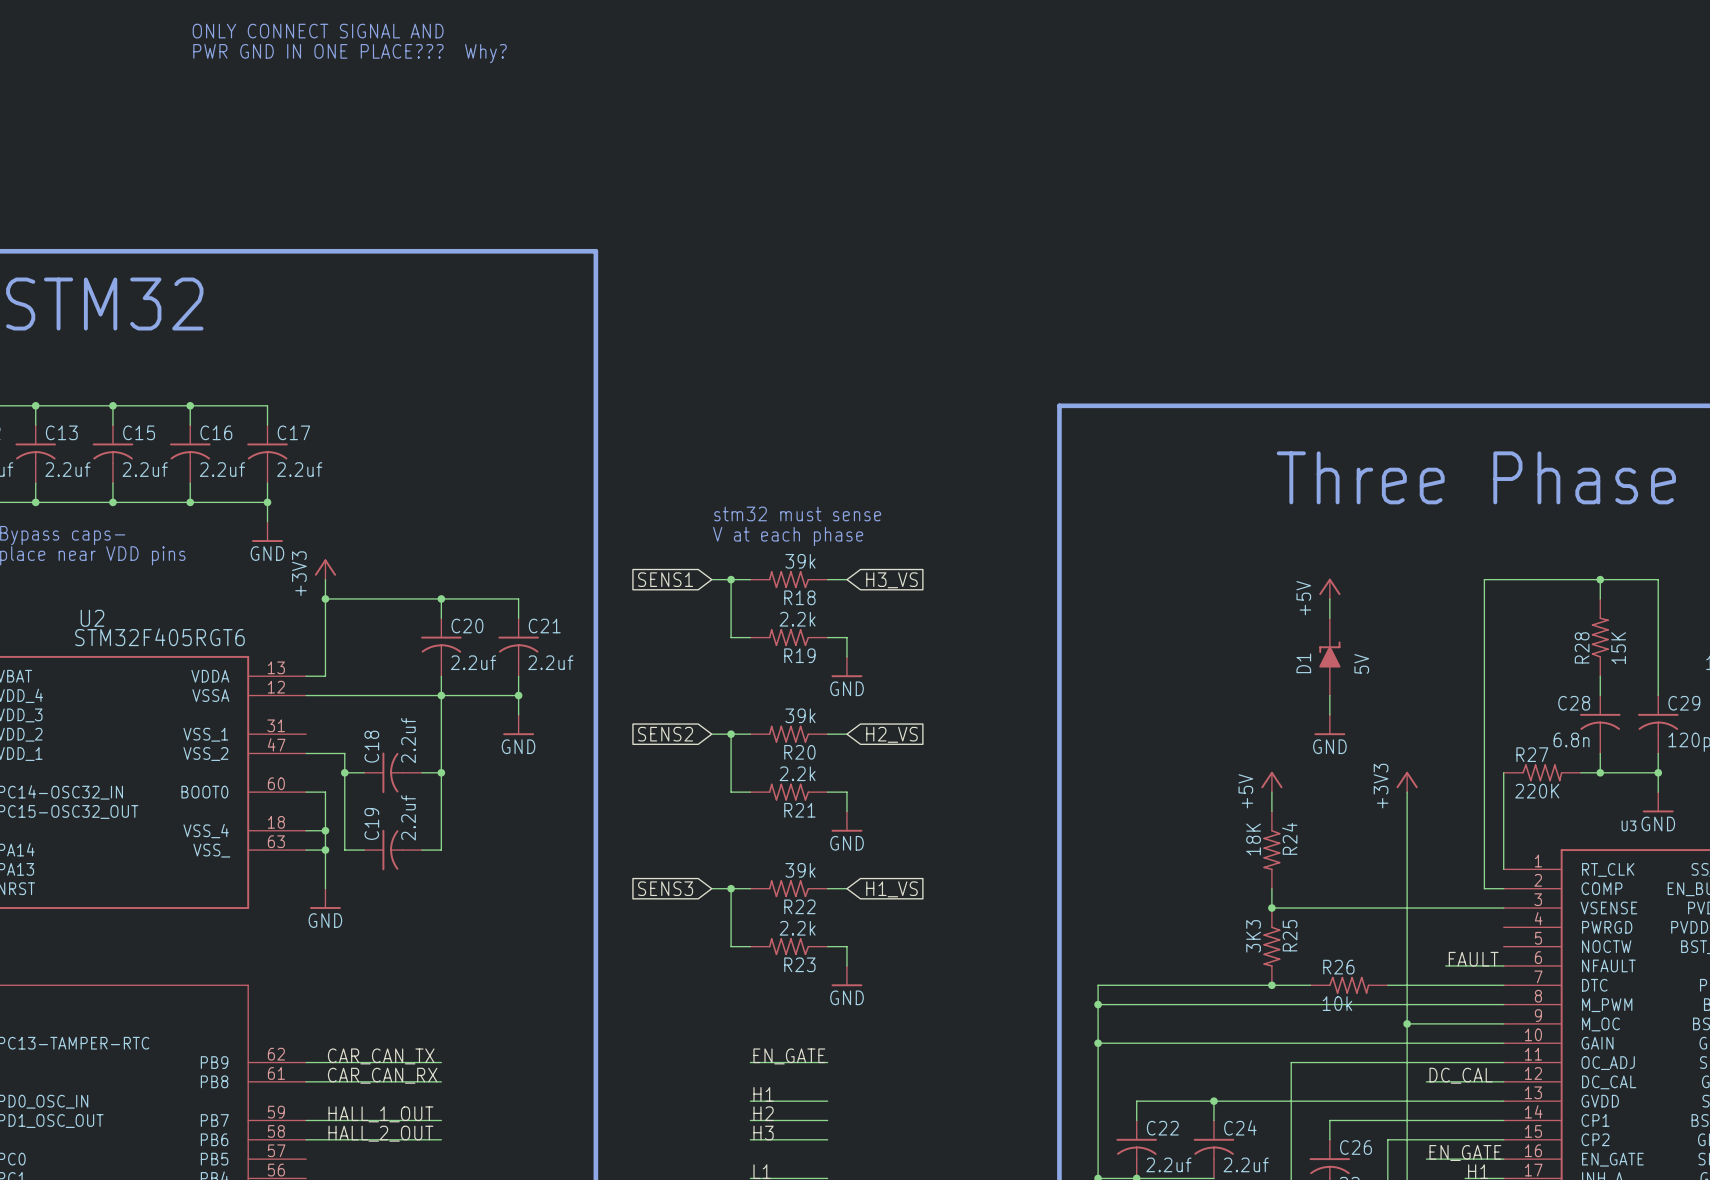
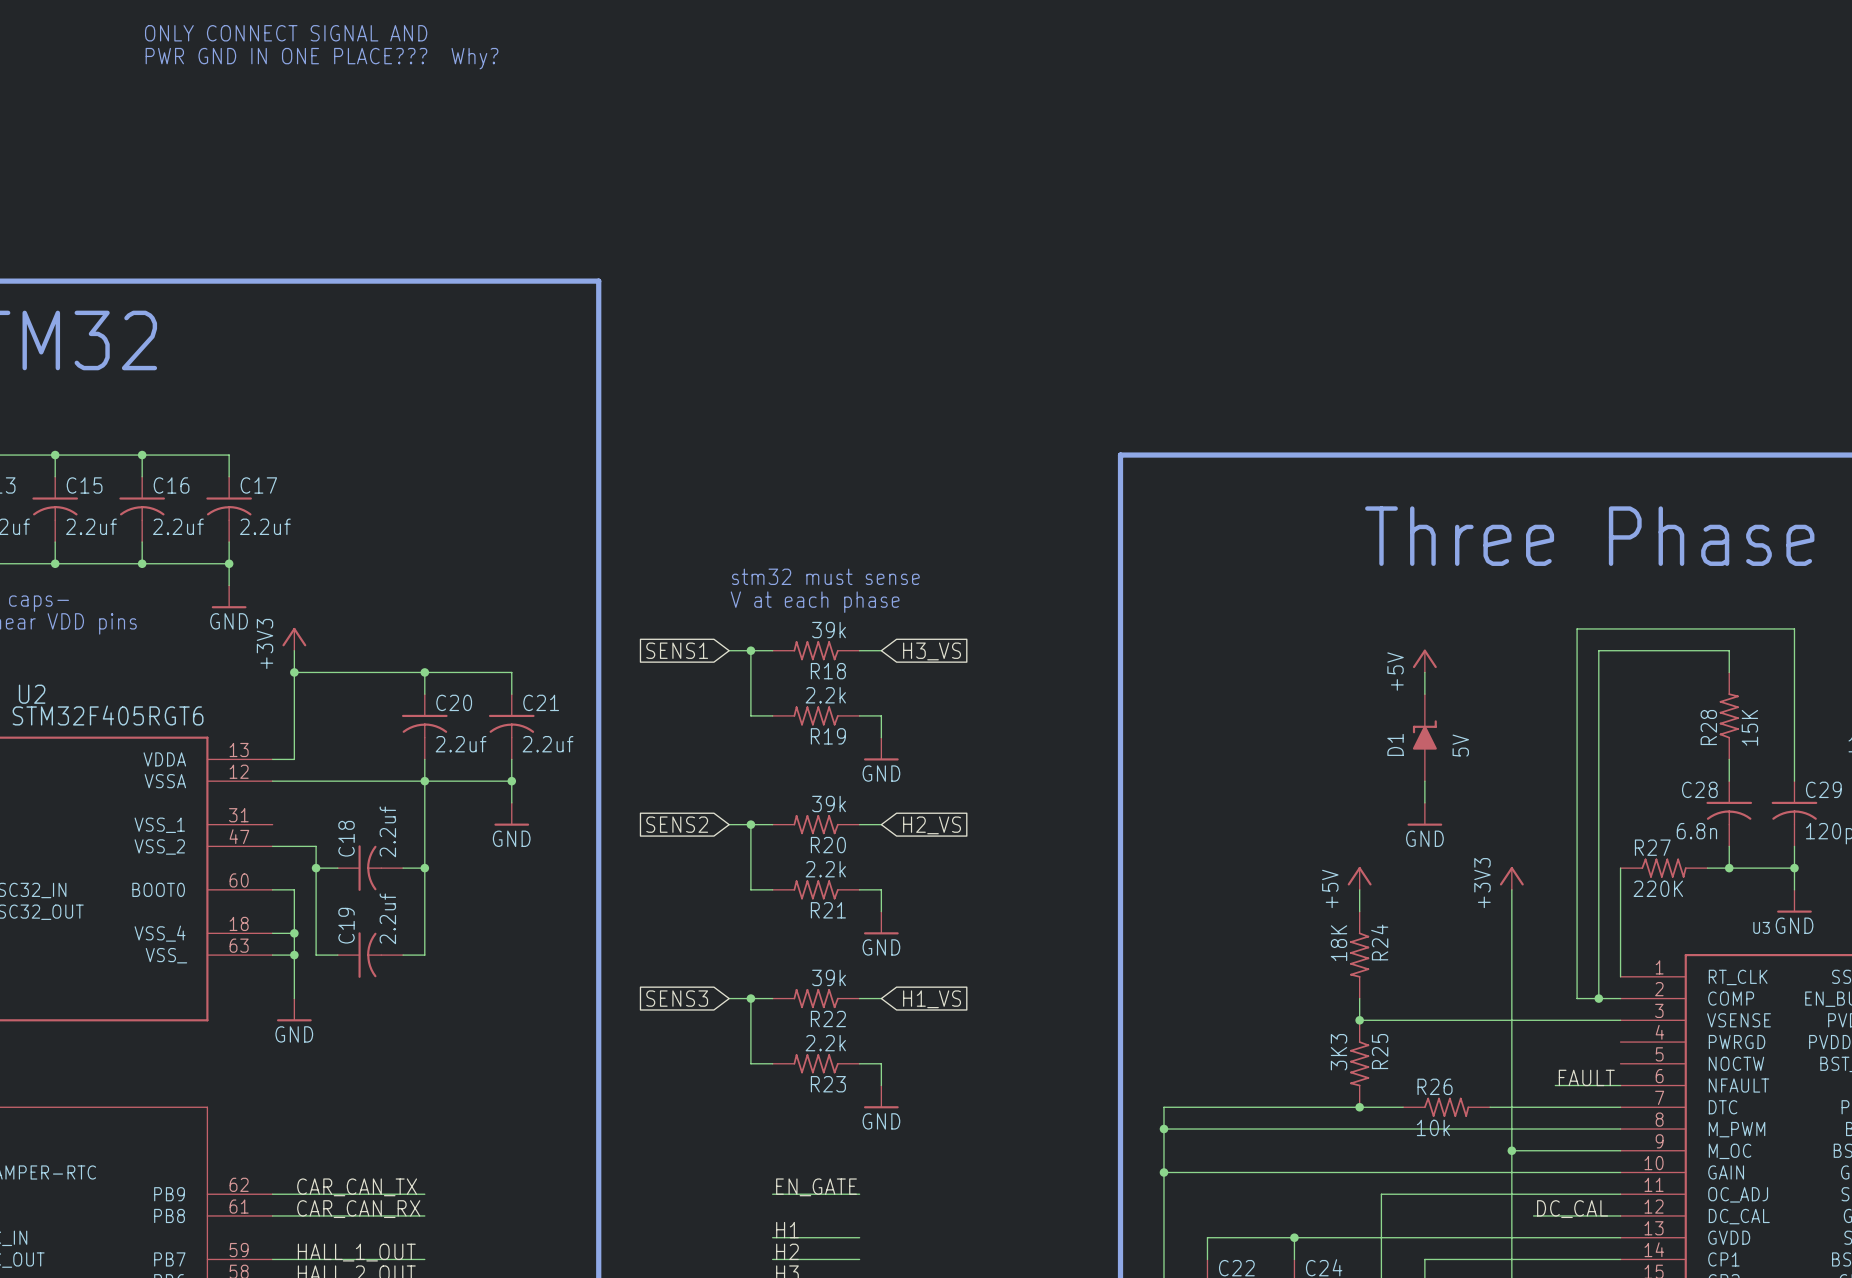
wire: (1600, 579) (1658, 579) -> (1598, 998) (1577, 998) (1577, 628) (1794, 628) (1794, 650)
junction: (1600, 579) -> none
junction: none -> (1598, 998)

